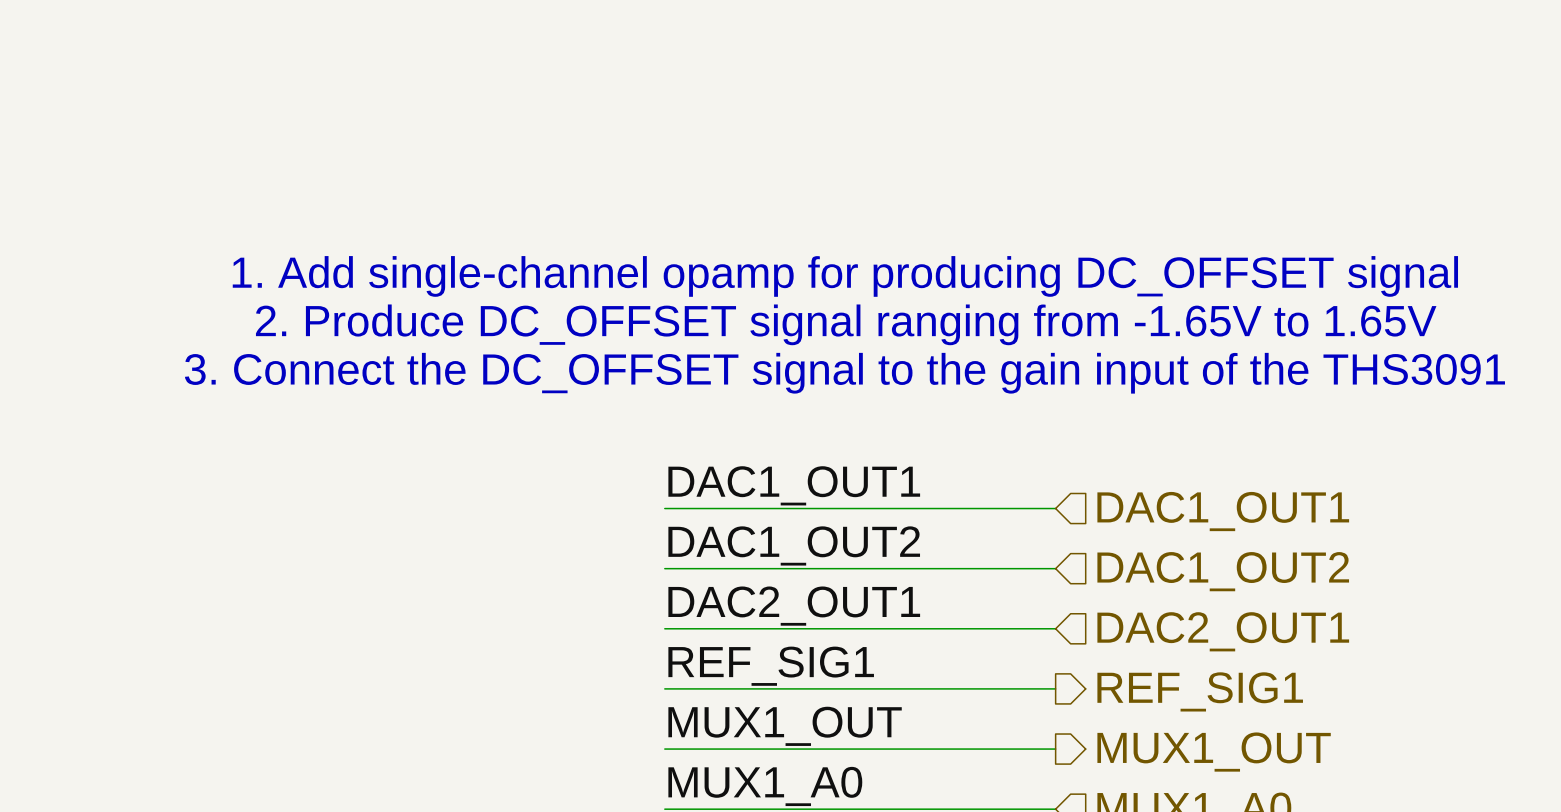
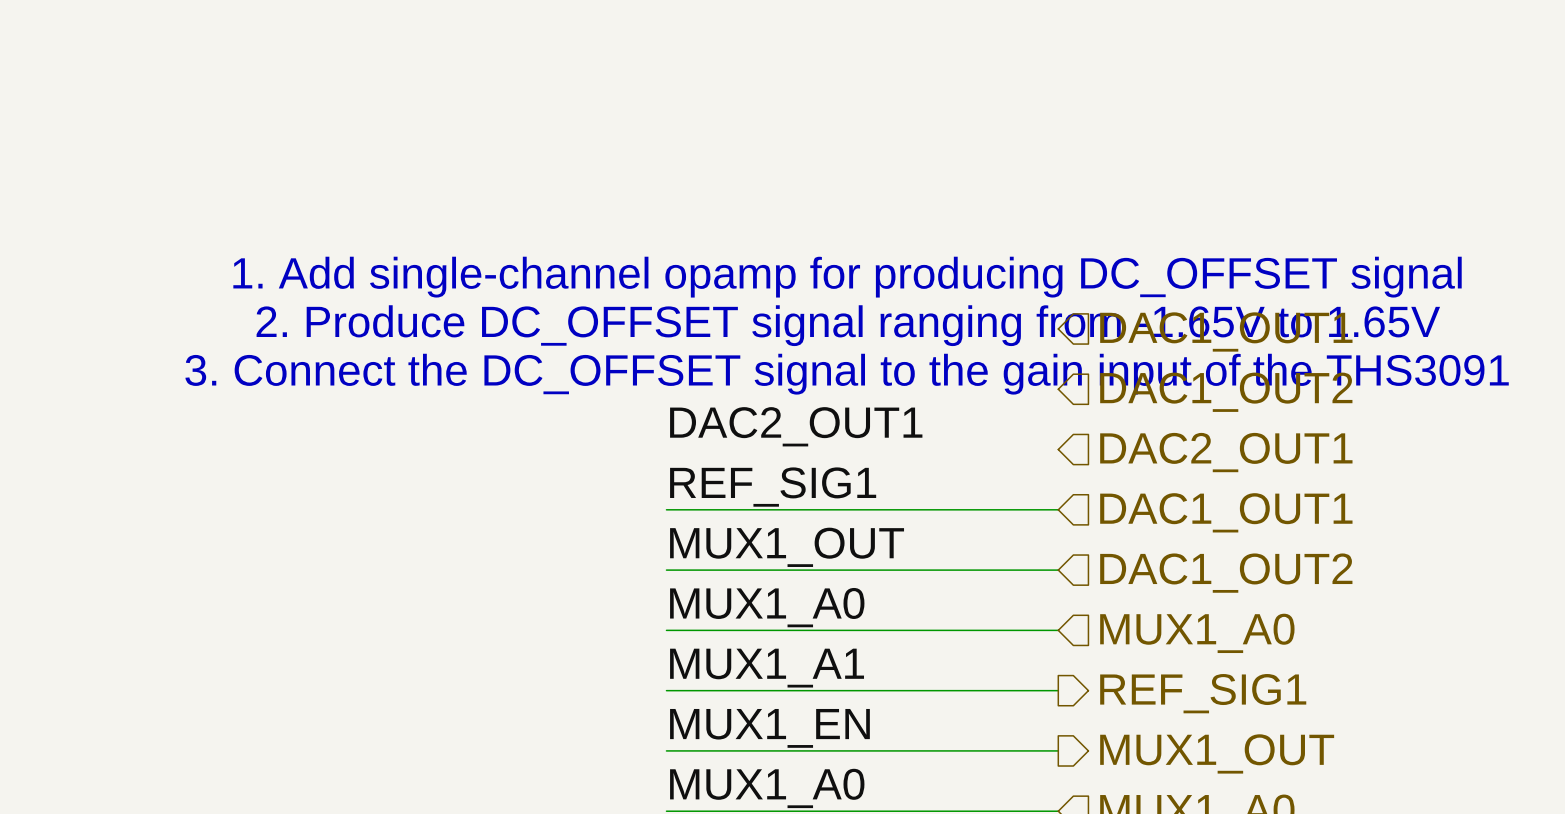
hierarchical label: none -> DAC1_OUT1 (1226, 331)
hierarchical label: none -> DAC1_OUT2 (1226, 392)
label: none -> DAC2_OUT1 (796, 426)
hierarchical label: none -> DAC2_OUT1 (1226, 452)
label: DAC1_OUT1 (794, 485) -> REF_SIG1 (773, 487)
label: DAC1_OUT2 (794, 545) -> MUX1_OUT (787, 547)
label: DAC2_OUT1 (794, 606) -> MUX1_A0 (767, 607)
hierarchical label: DAC2_OUT1 (1223, 631) -> MUX1_A0 (1197, 633)
label: REF_SIG1 (771, 666) -> MUX1_A1 (767, 668)
label: MUX1_OUT (785, 726) -> MUX1_EN (769, 728)

